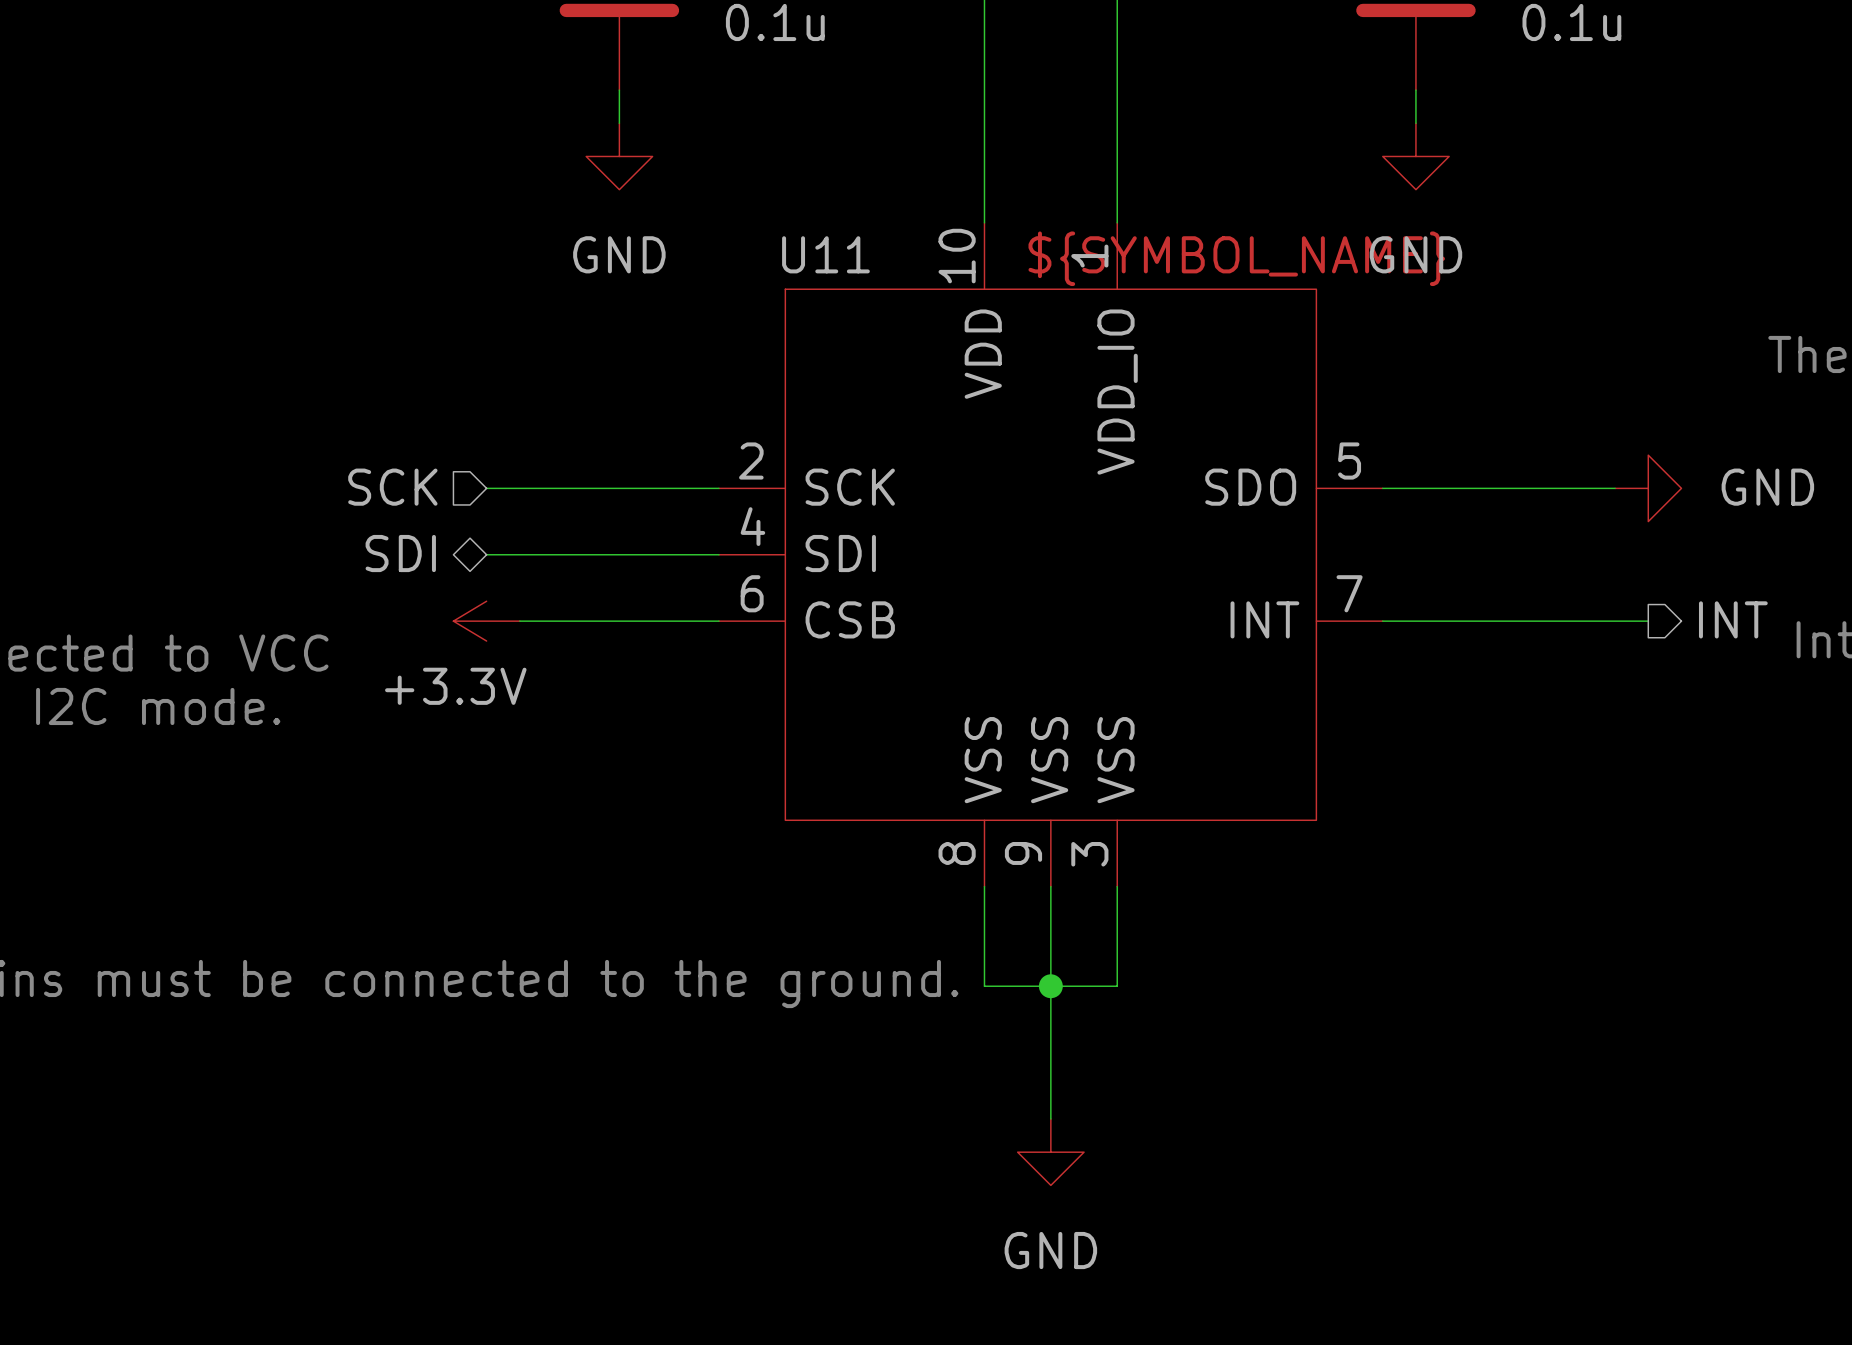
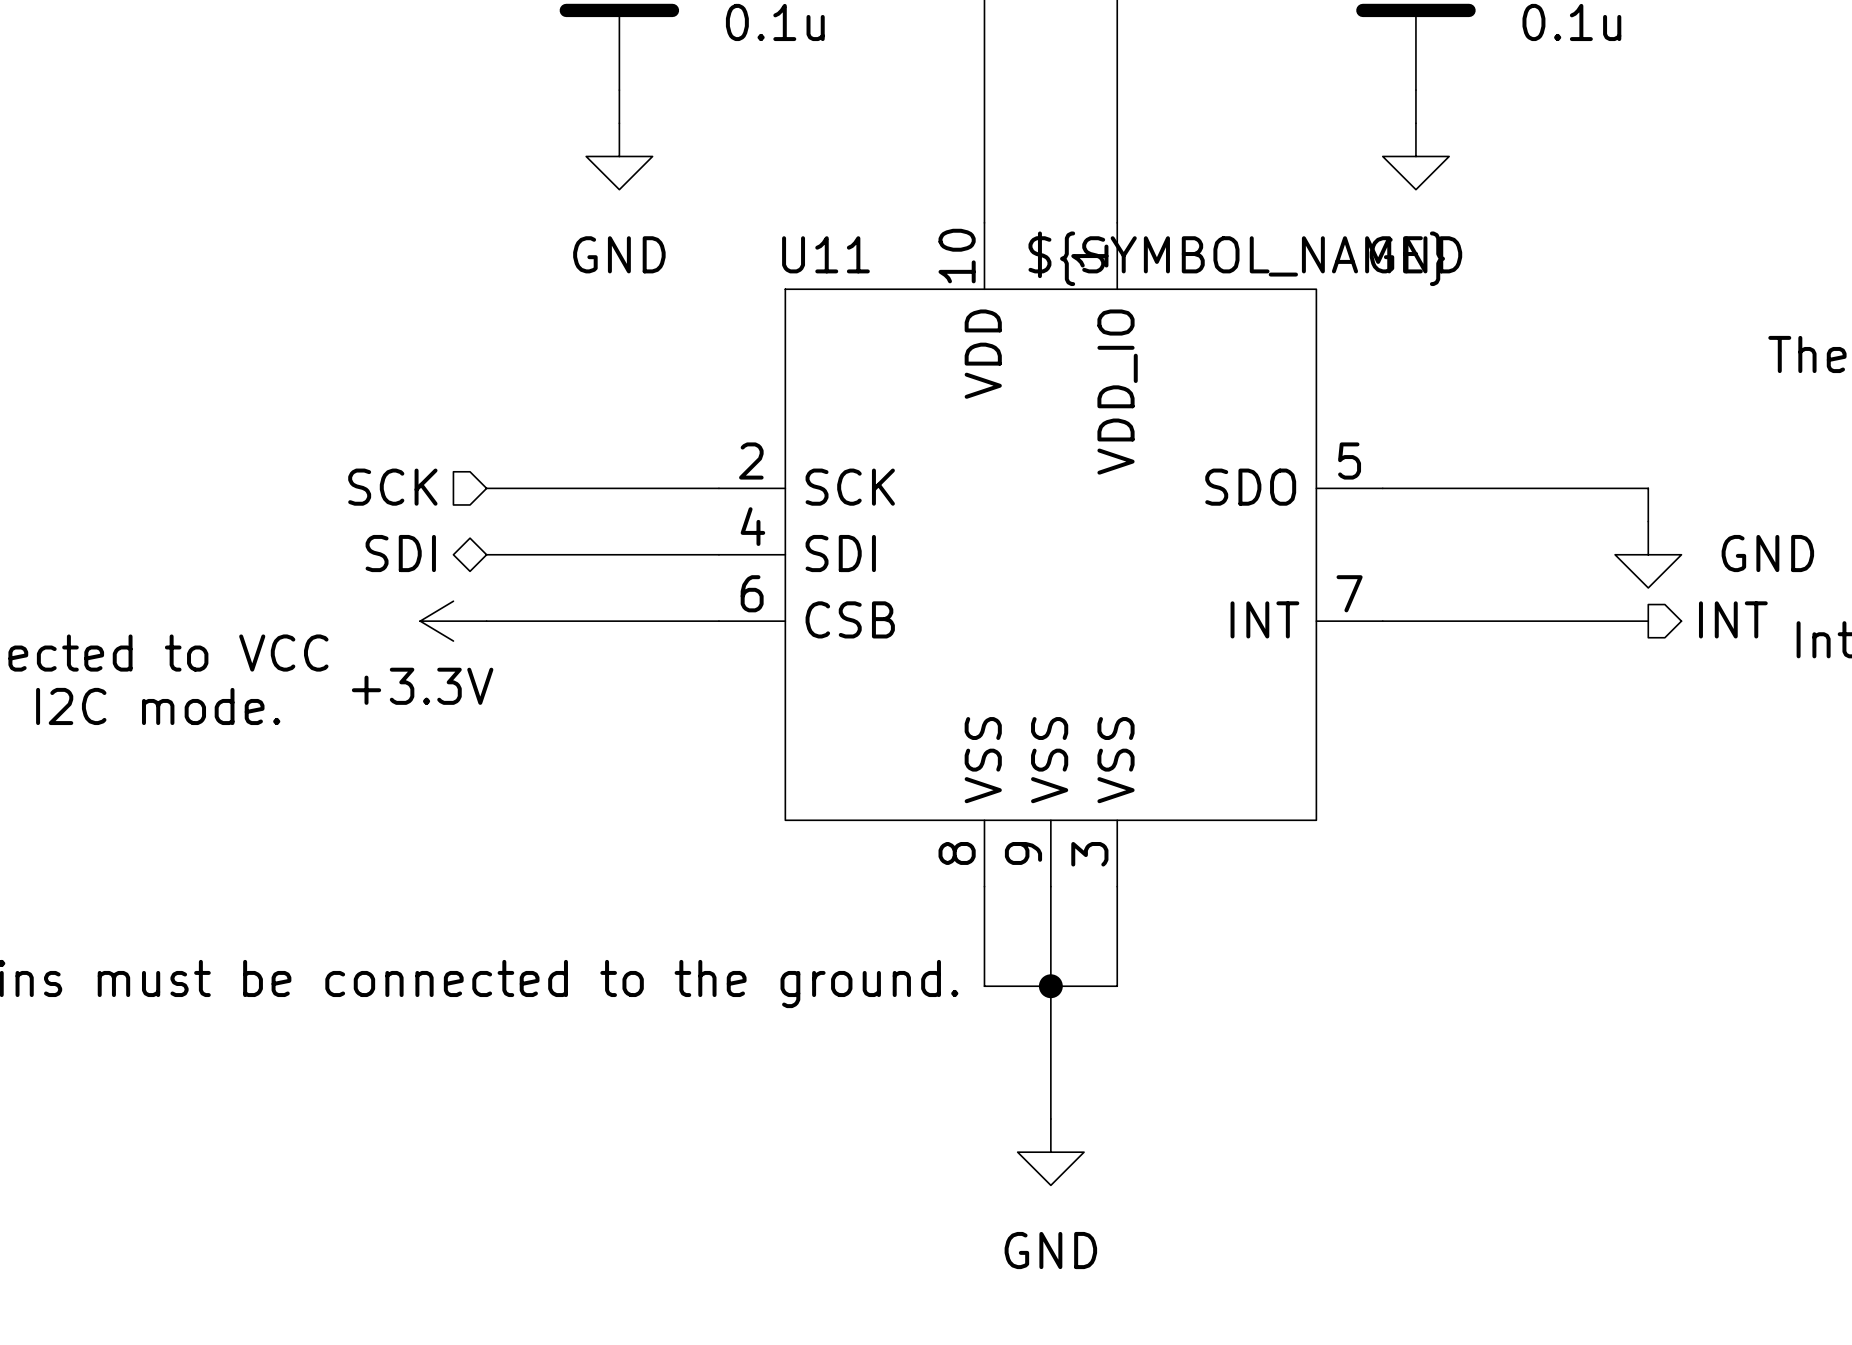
power symbol rotation: 0° (1648, 488) -> 90° clockwise (1648, 554)
power symbol position: GND (1648, 488) -> GND (1648, 554)
power symbol position: +3.3V (486, 621) -> +3.3V (453, 621)

